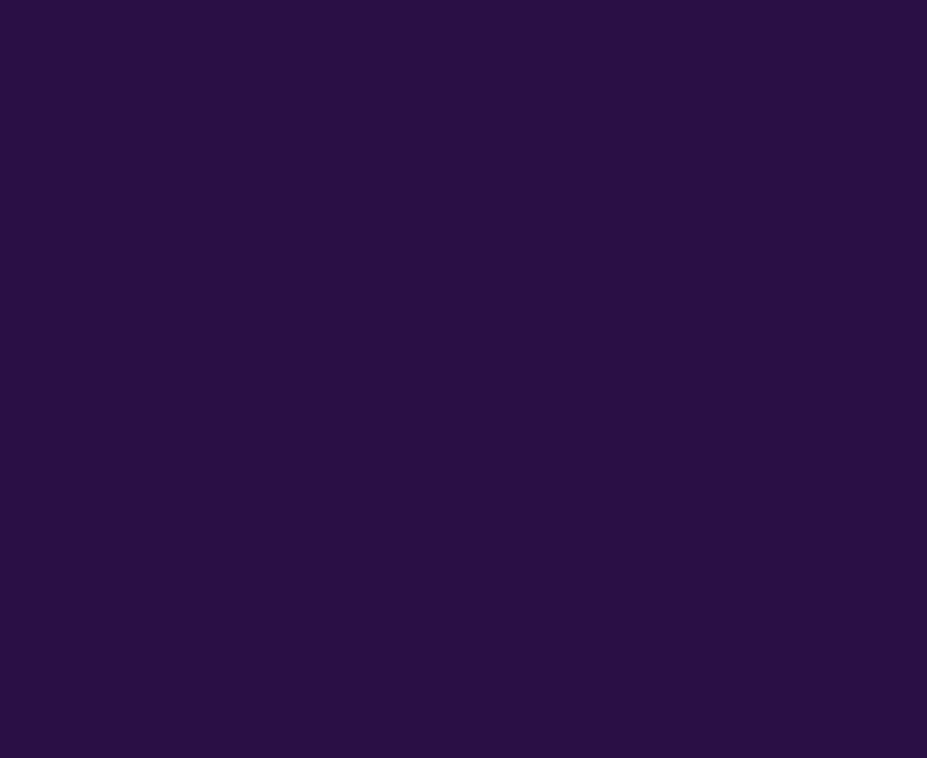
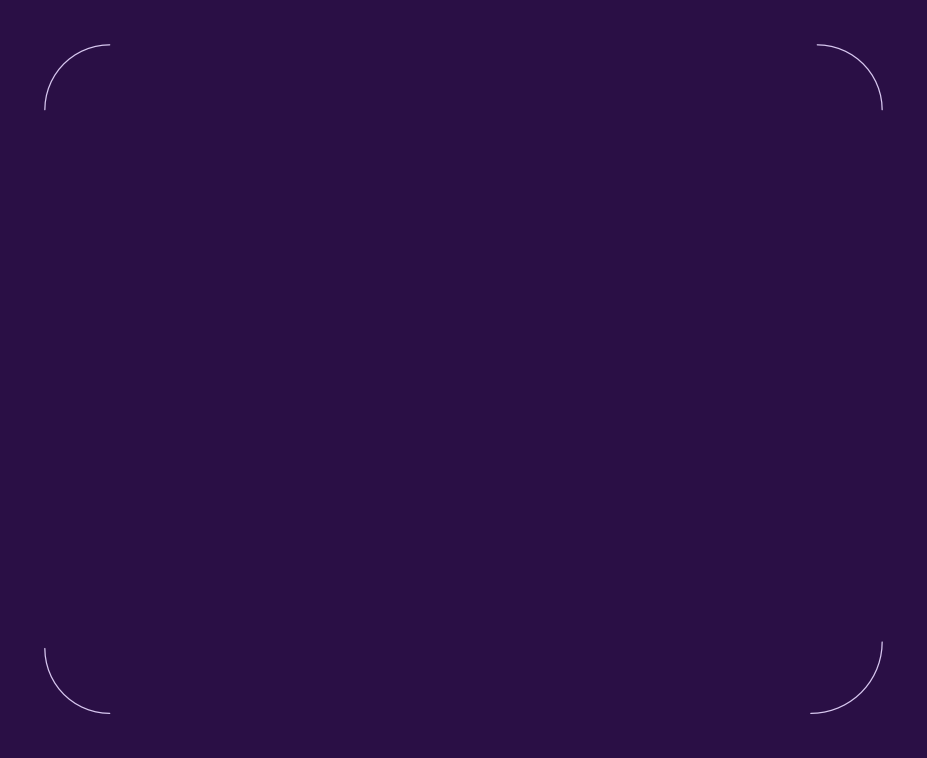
board edge: none -> (109, 44) (88, 48) (75, 54) (63, 63) (51, 81) (46, 95) (44, 109)
board edge: none -> (817, 44) (838, 48) (851, 54) (863, 63) (872, 75) (878, 88) (882, 109)
board edge: none -> (882, 641) (876, 669) (861, 692) (838, 707) (810, 713)
board edge: none -> (44, 648) (48, 669) (54, 683) (63, 694) (81, 706) (95, 711) (109, 713)

